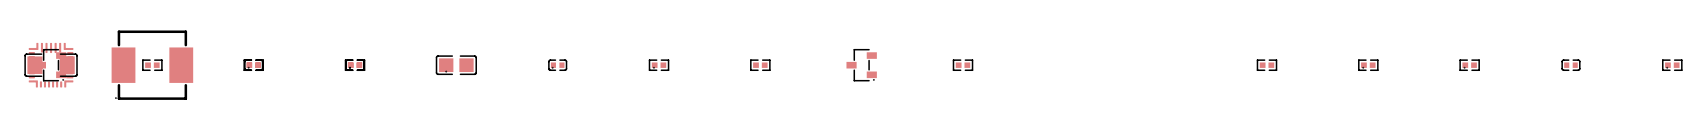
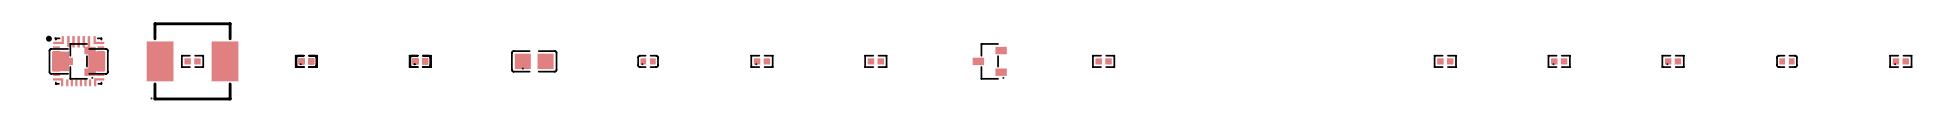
part footprint: [28, 42, 74, 88] -> [45, 35, 105, 87]

